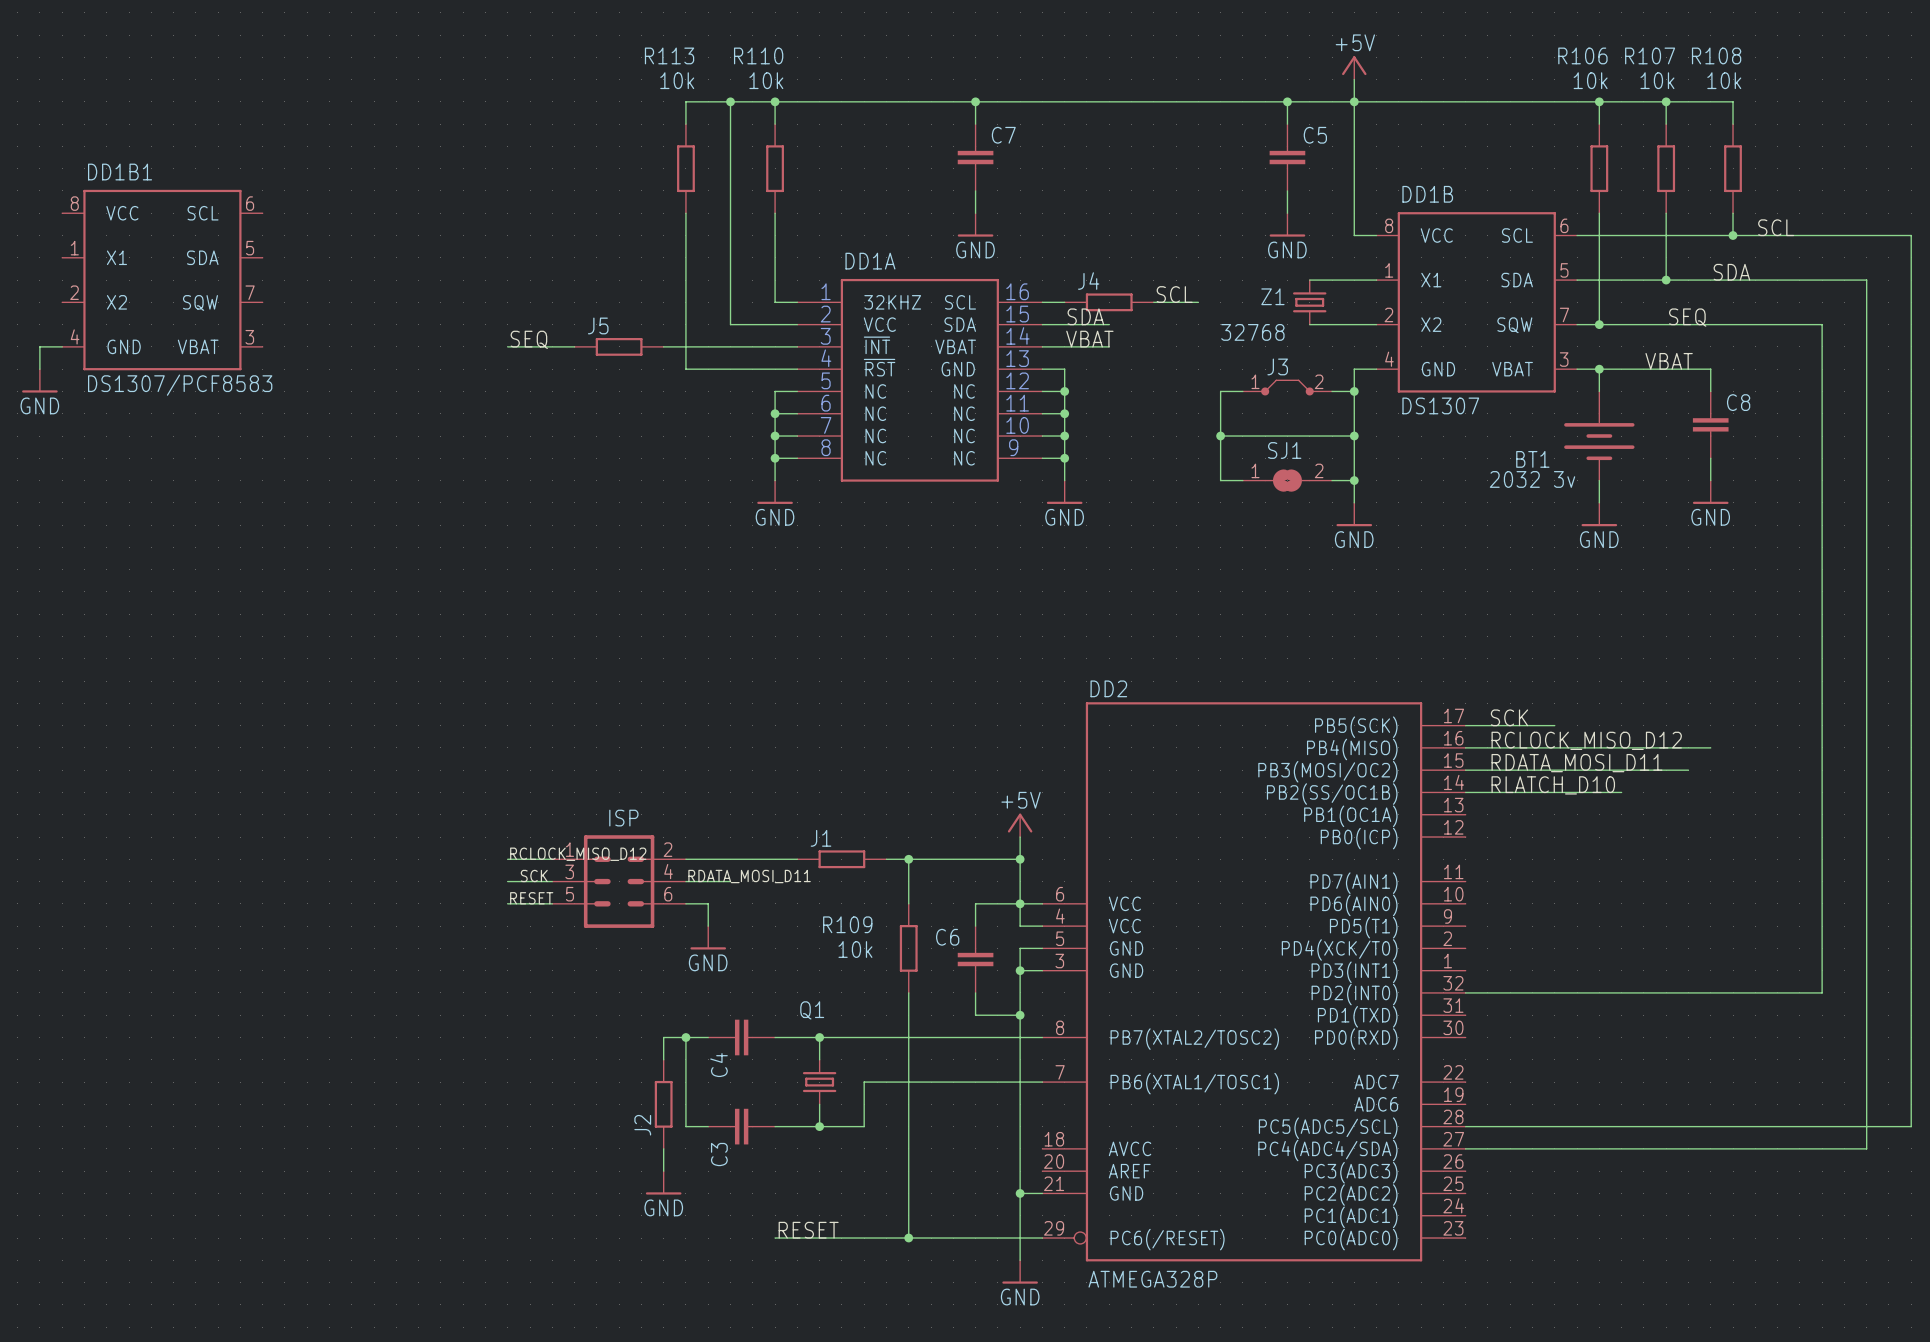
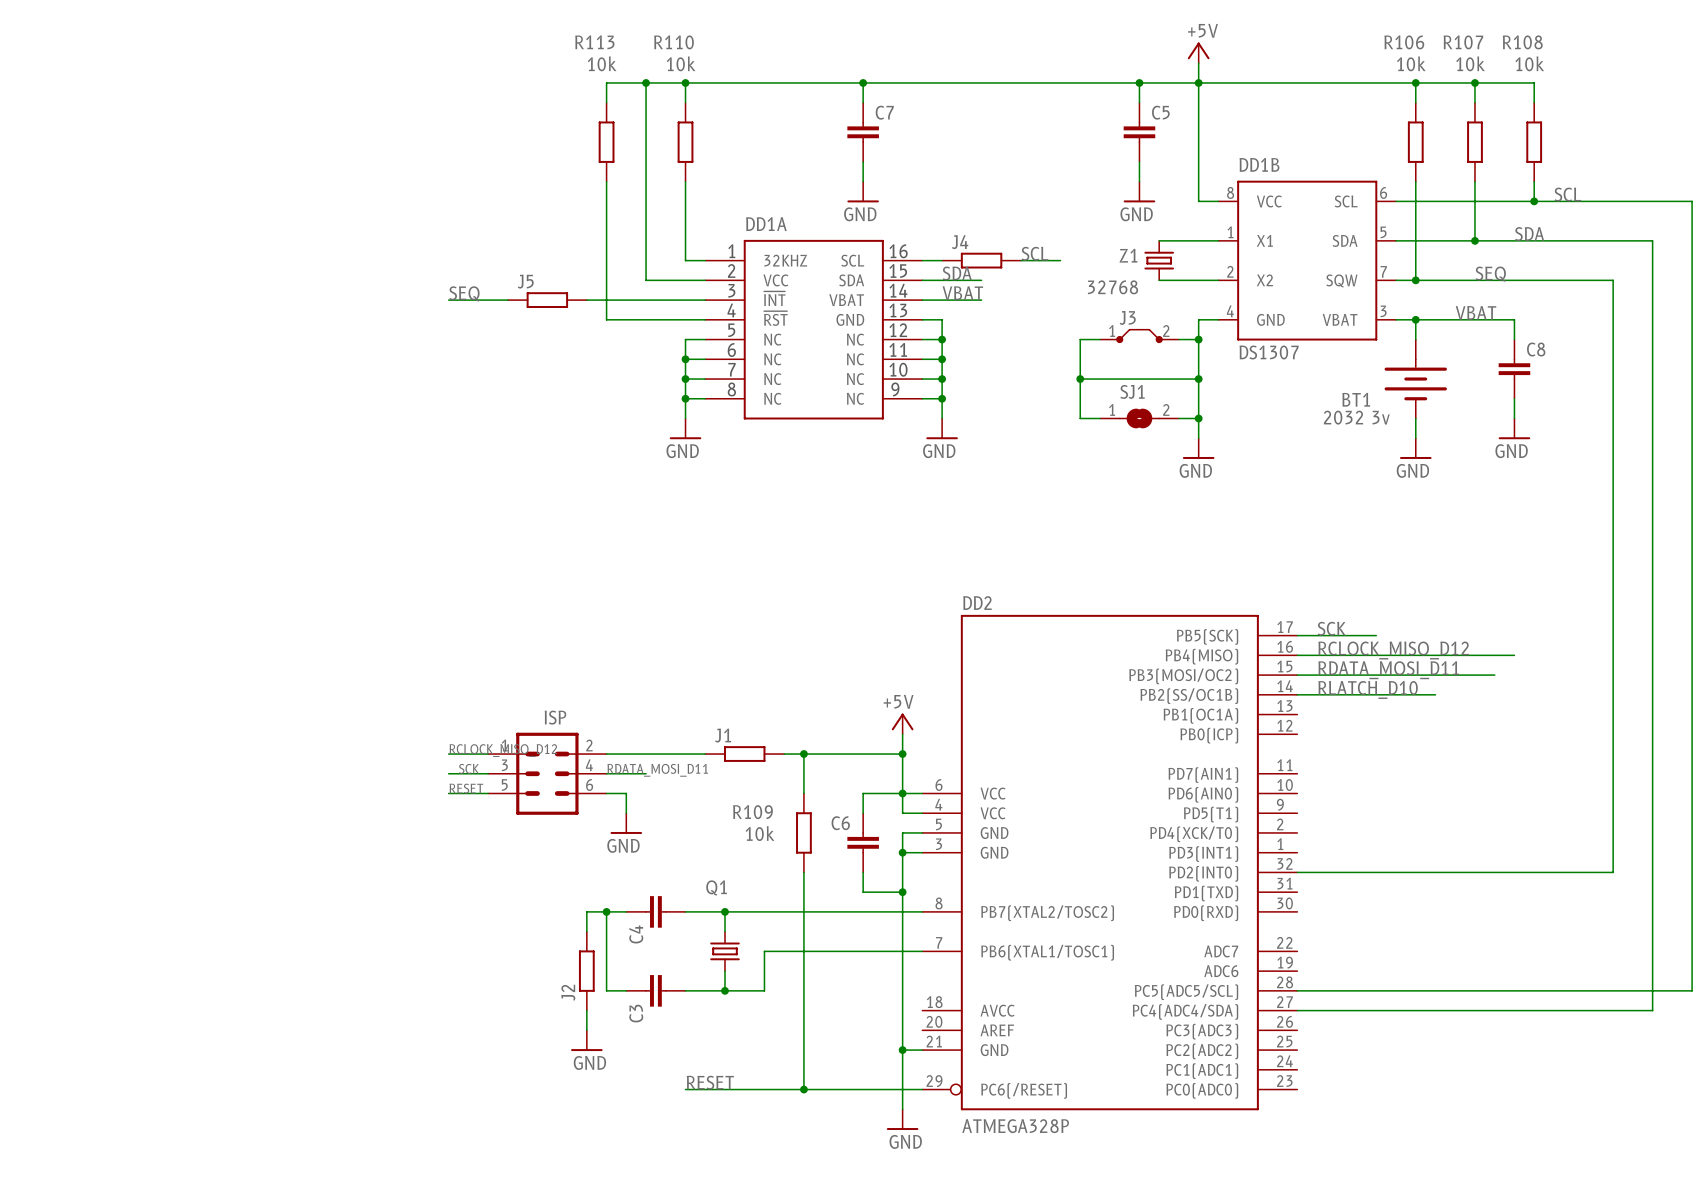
DD1B1: DS1307/PCF8583 (162, 280) -> none
wire: (62, 346) (39, 346) (39, 369) -> none
power symbol: GND (39, 380) -> none

